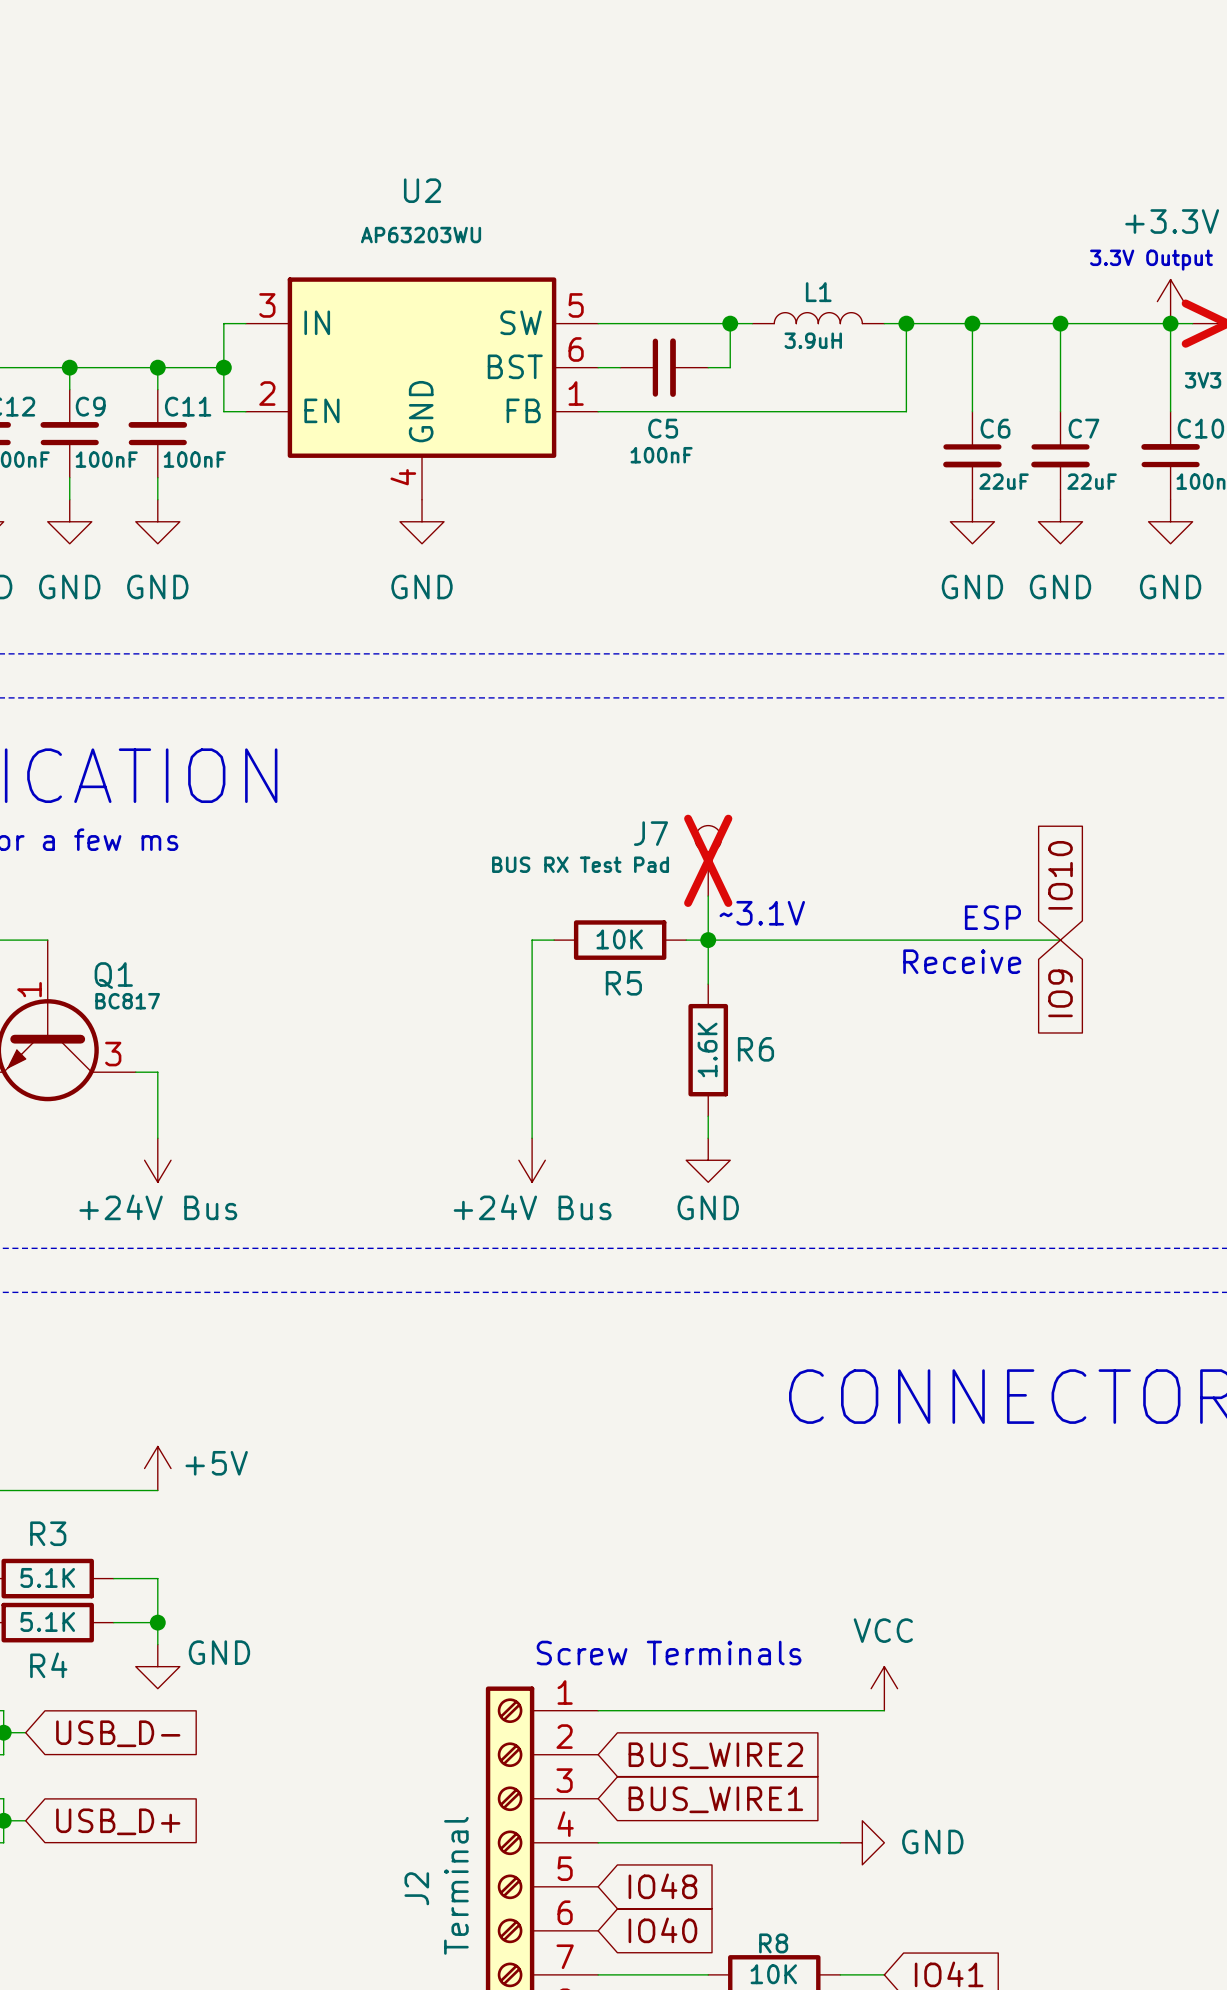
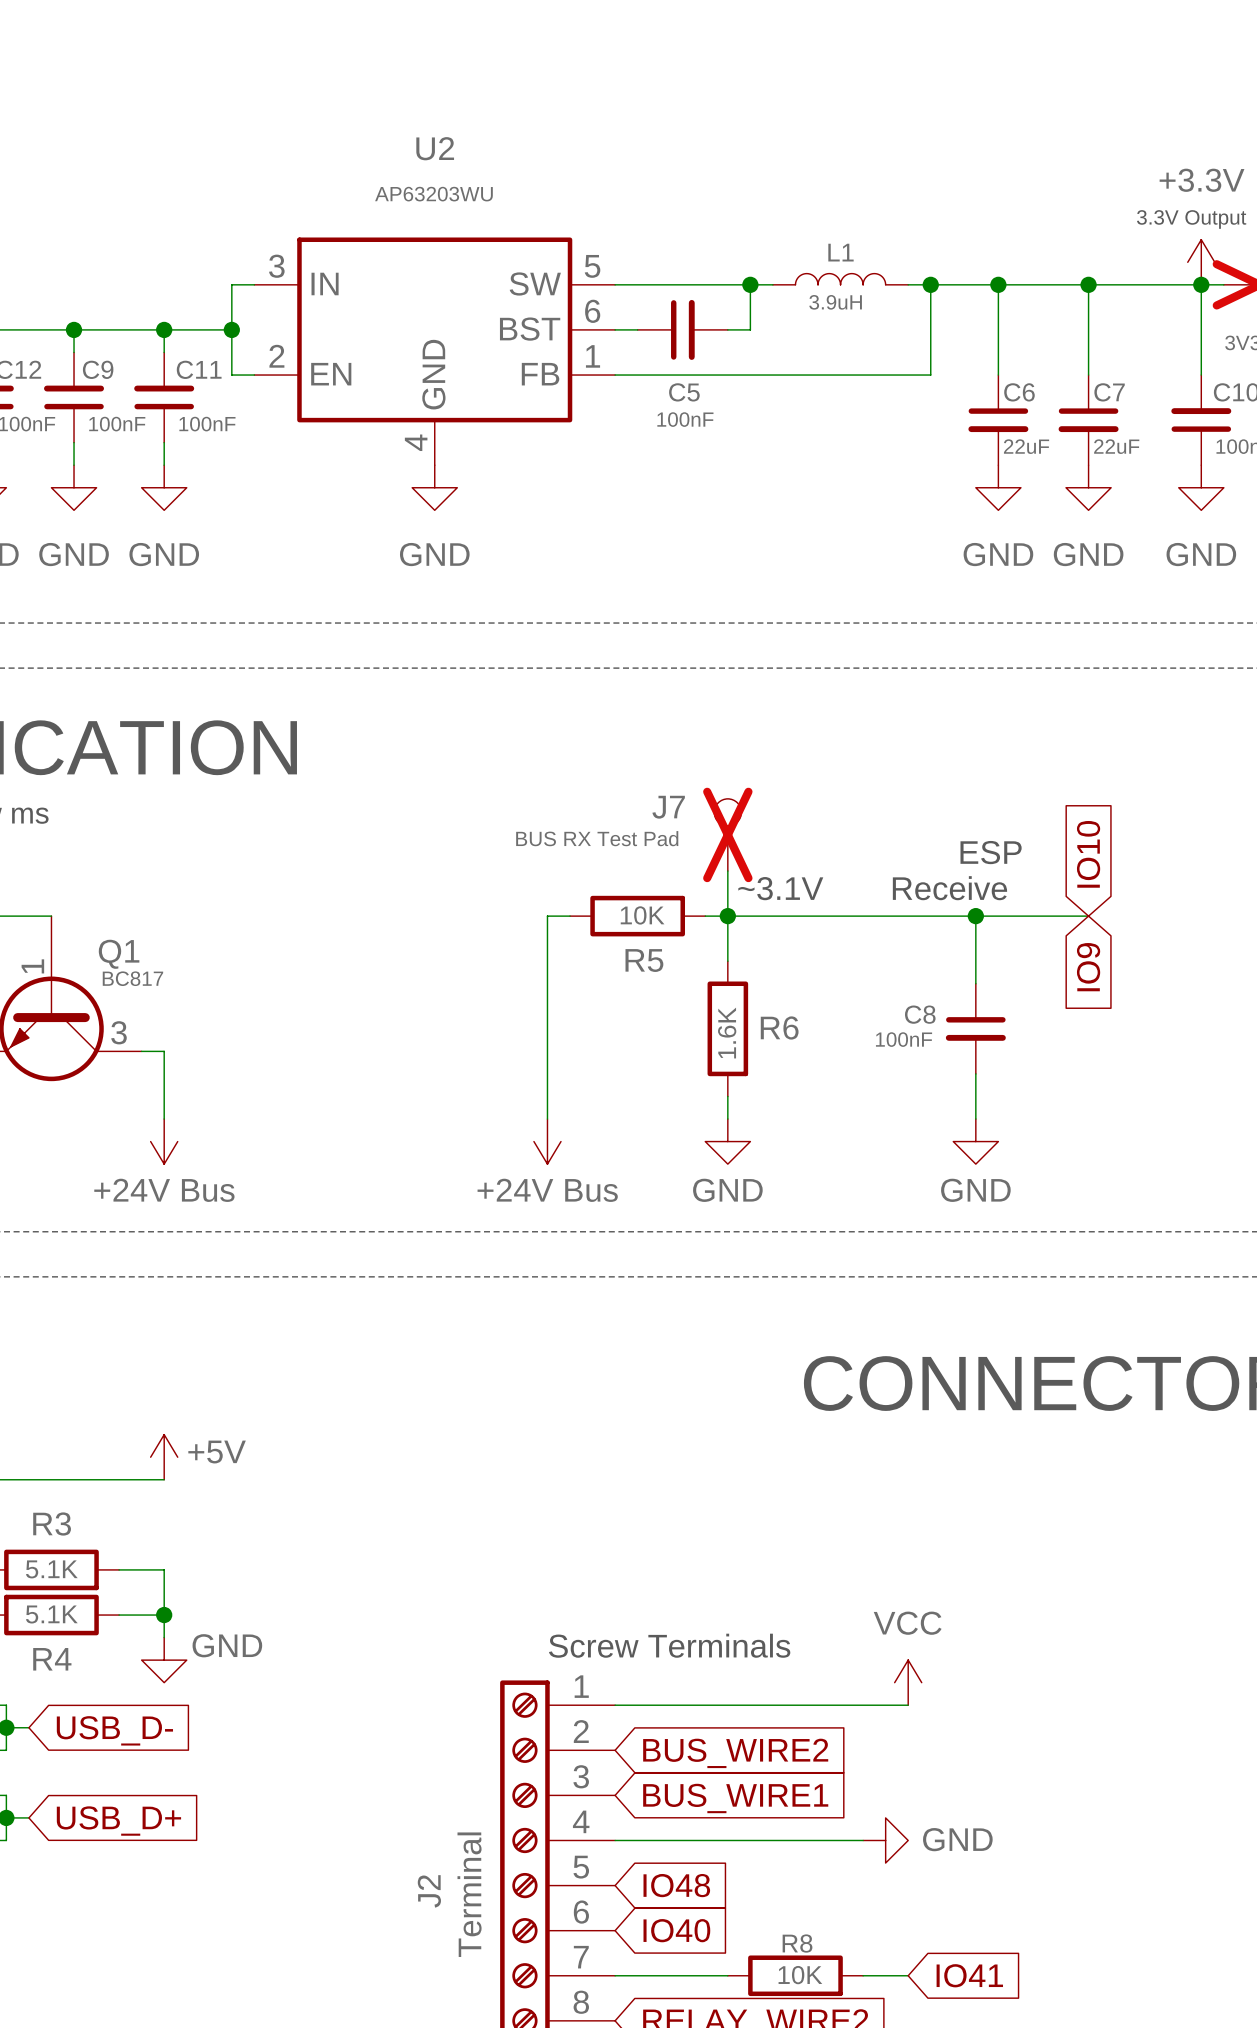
text position: ESP (992, 917) -> ESP (991, 852)
wire: none -> (975, 916) (975, 983)
junction: none -> (975, 916)
text position: Receive (962, 961) -> Receive (949, 888)
C8: none -> 100nF (975, 1028)
wire: none -> (975, 1073) (975, 1119)
power symbol: none -> GND (975, 1141)

